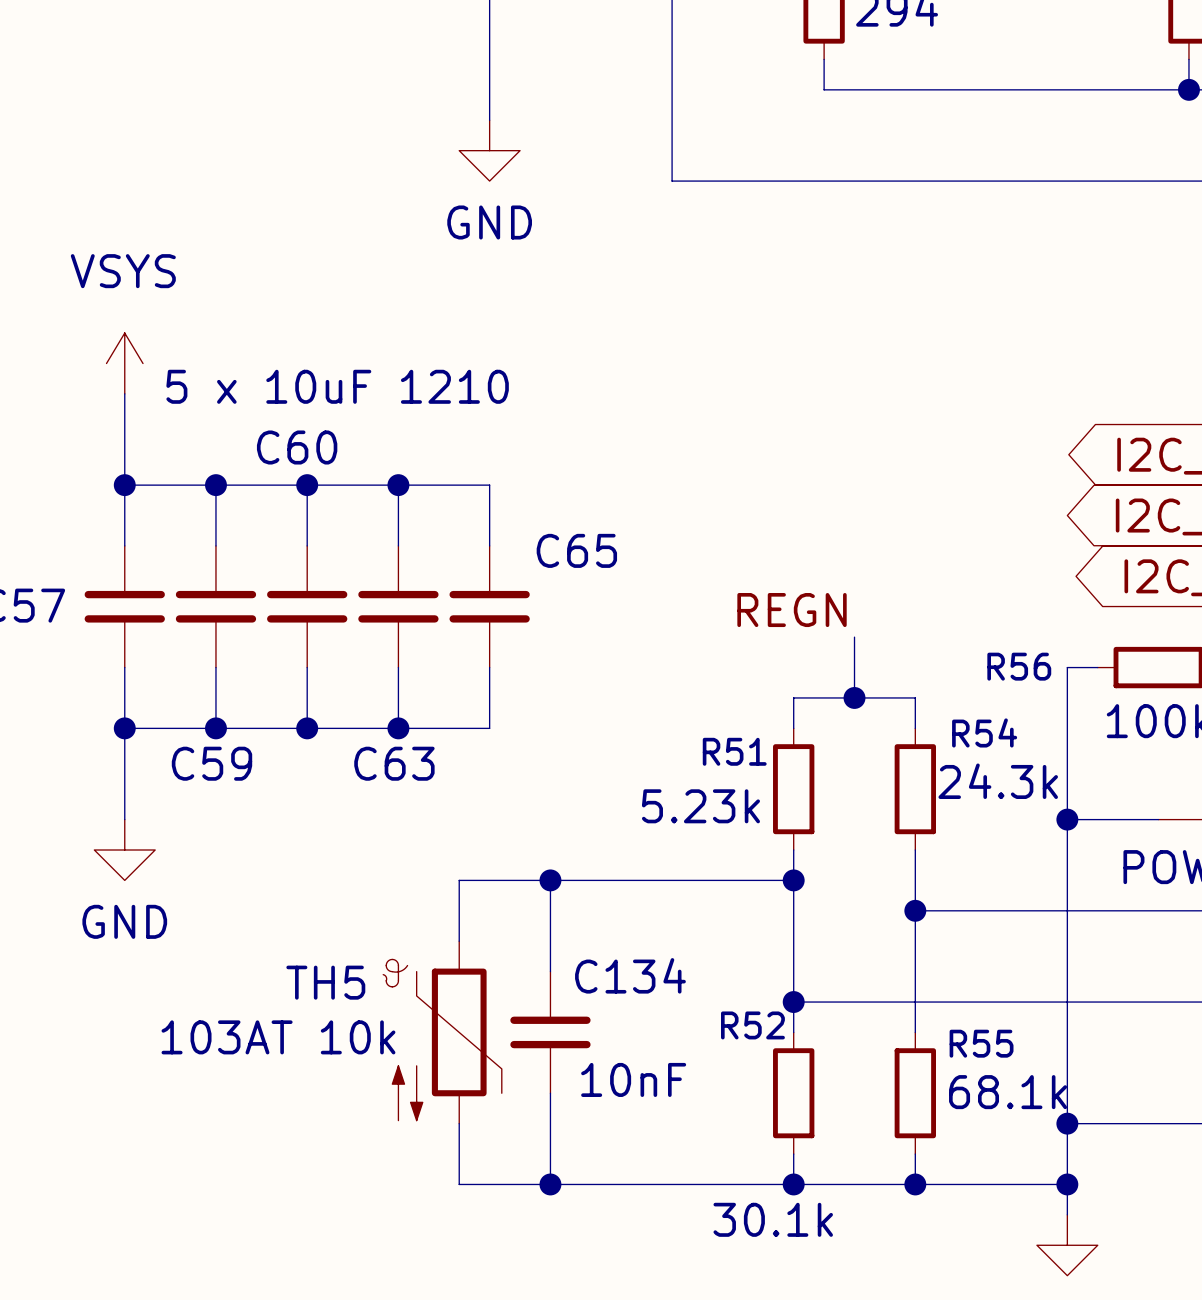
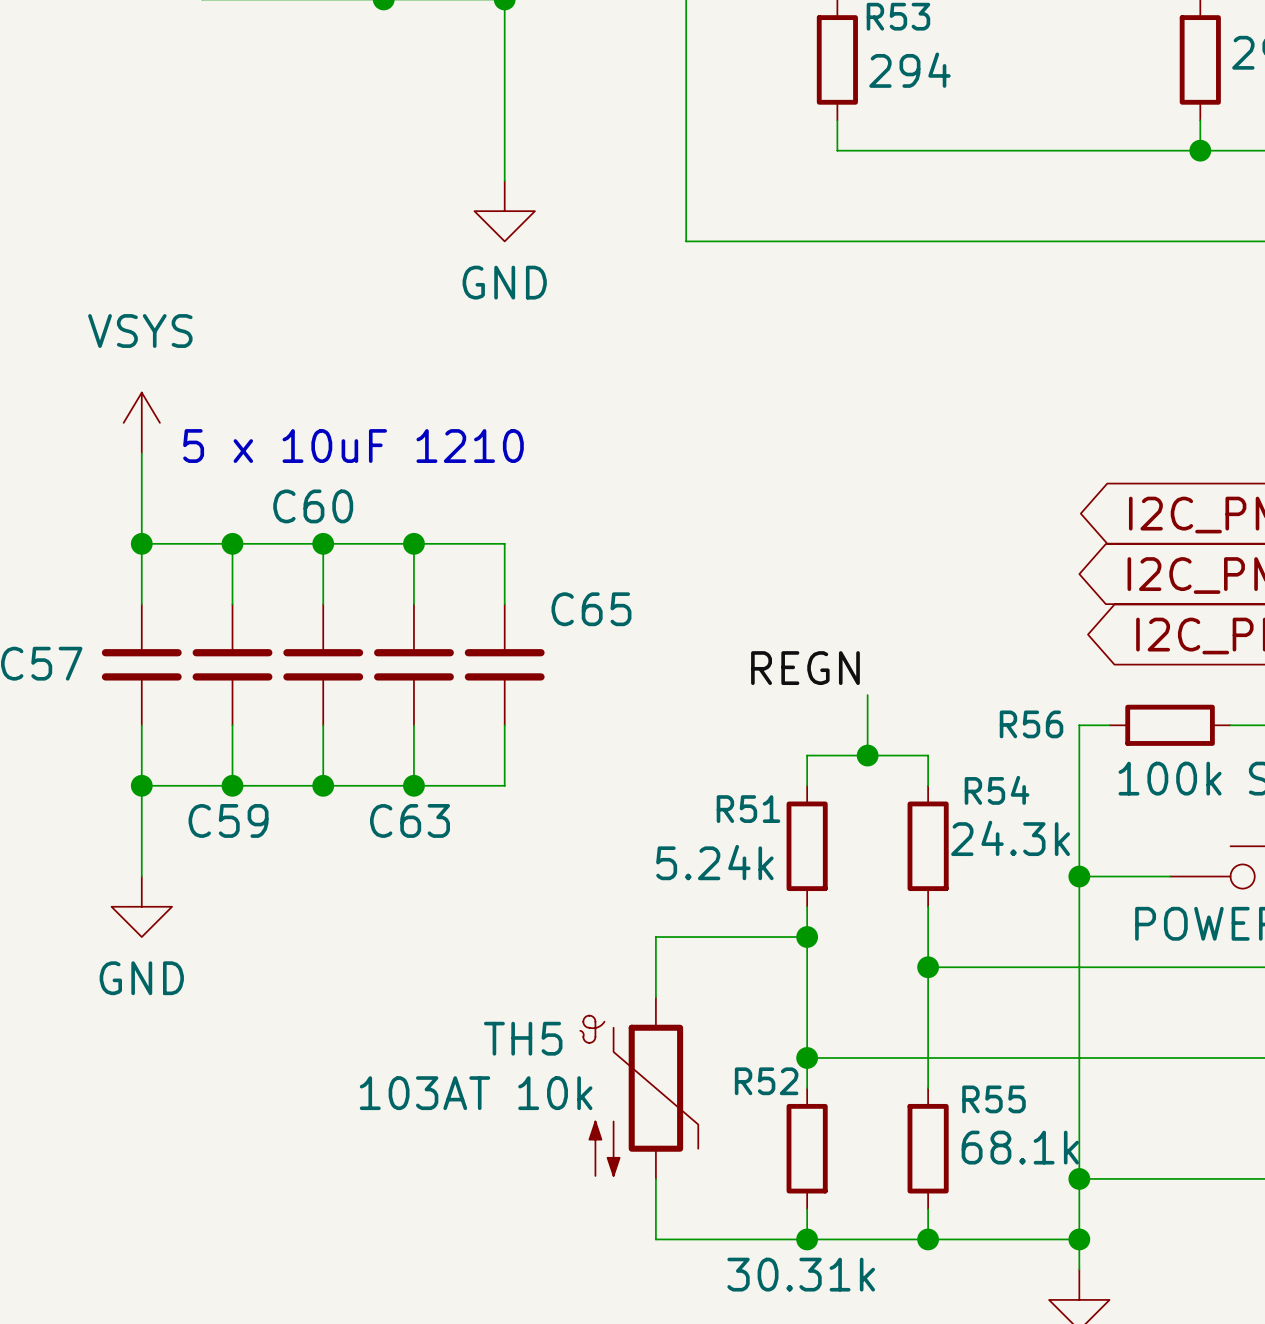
R51 value: 5.23k (700, 806) -> 5.24k (714, 862)
wire: (550, 880) (550, 971) -> none
junction: (550, 880) -> none
wire: (641, 880) (459, 880) (459, 941) -> (655, 937) (655, 997)
TH5 position: (442, 1032) -> (639, 1088)
C134: 10nF (550, 1032) -> none
wire: (550, 1093) (550, 1184) -> none
wire: (459, 1123) (459, 1184) (641, 1184) -> (655, 1178) (655, 1239)
junction: (550, 1184) -> none
R52 value: 30.1k (773, 1219) -> 30.31k (801, 1274)

